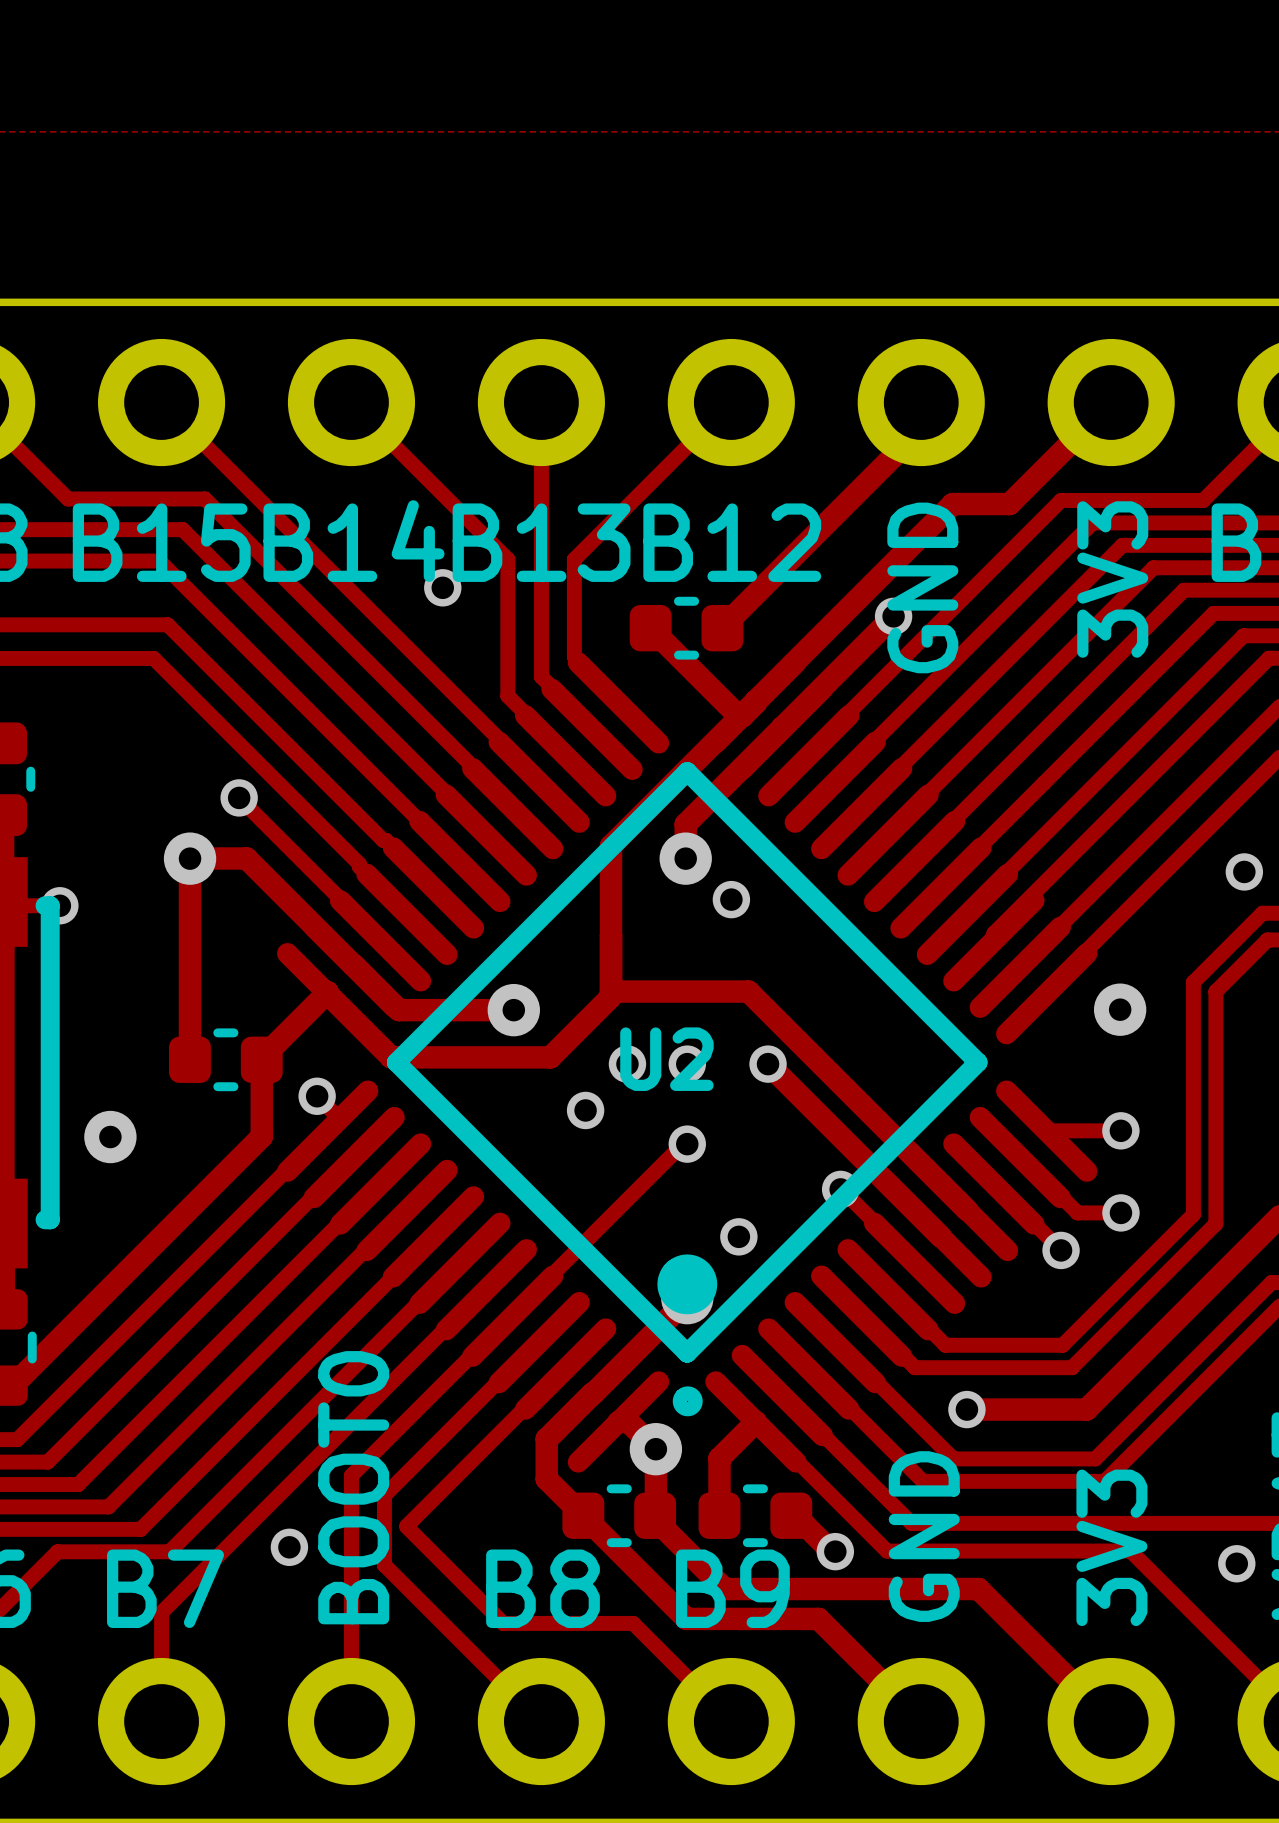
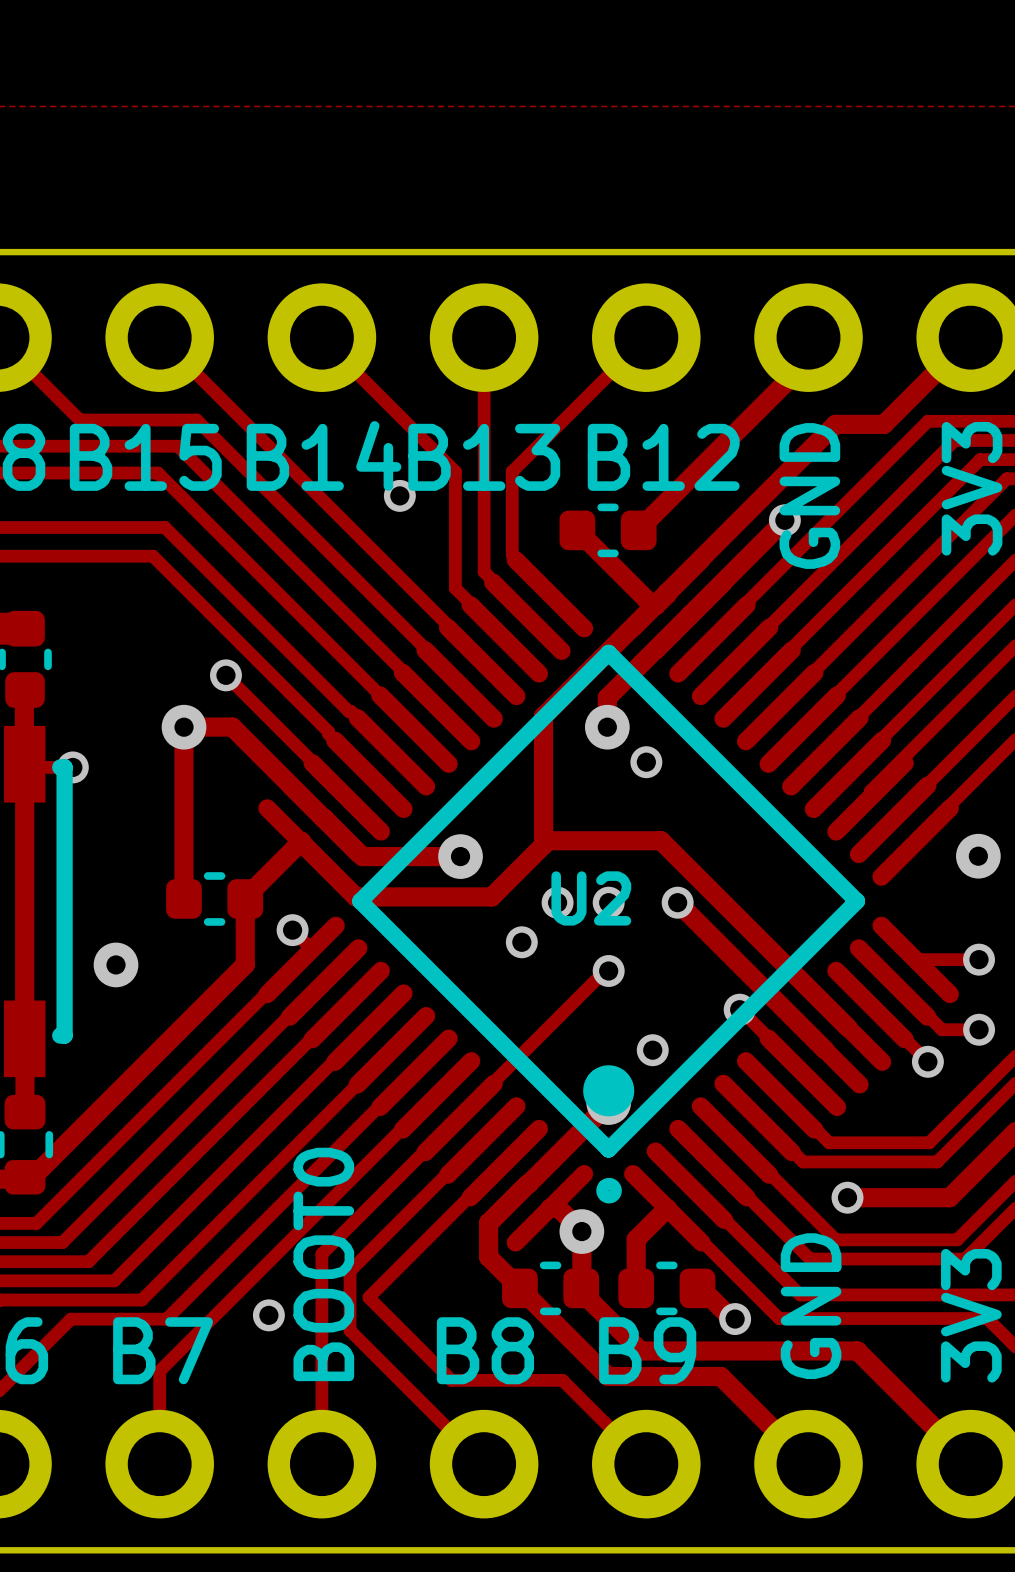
text position: B15 (161, 542) -> B15 (145, 457)
text position: B12 (732, 542) -> B12 (663, 457)

